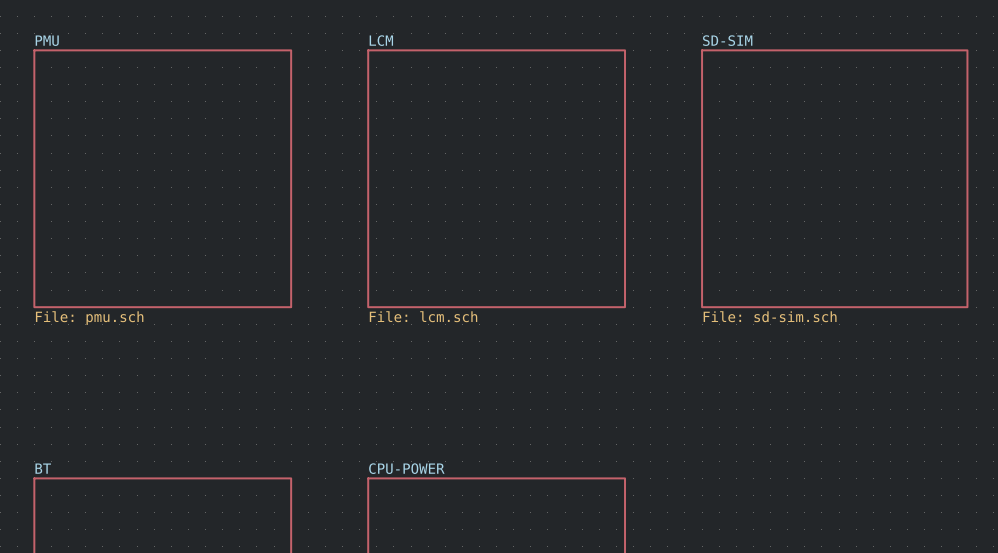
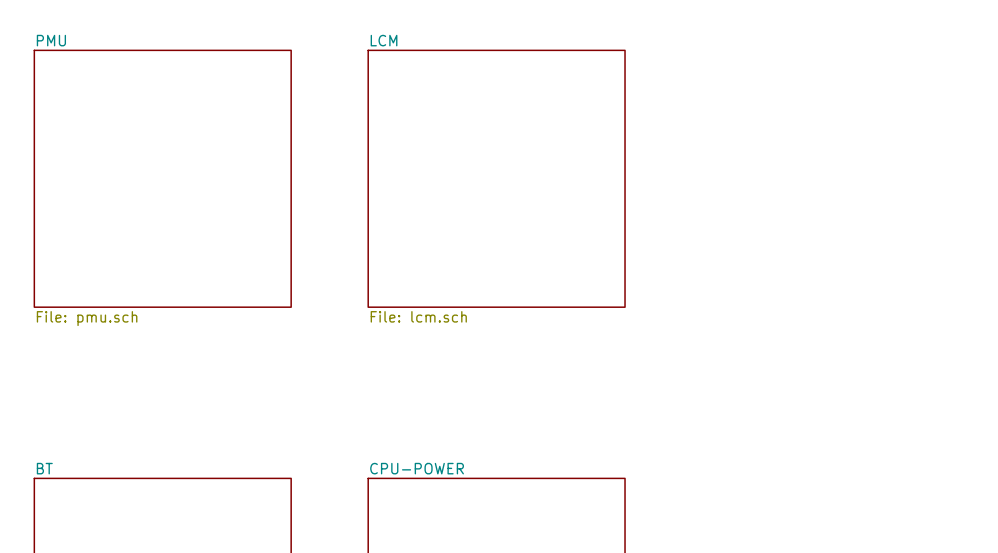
sheet SD-SIM: File: sd-sim.sch (834, 178) -> none

